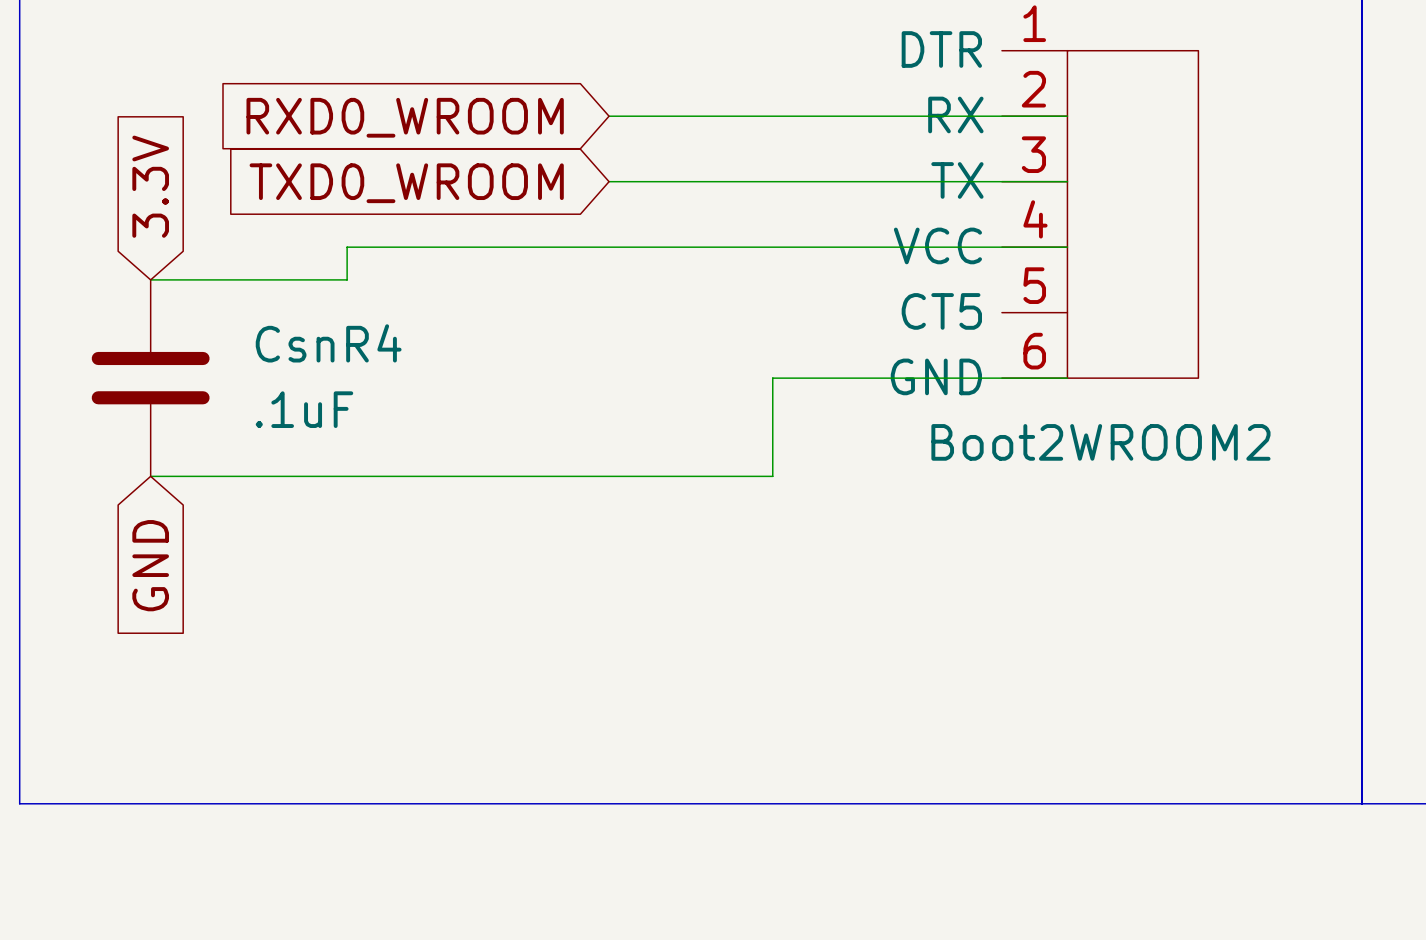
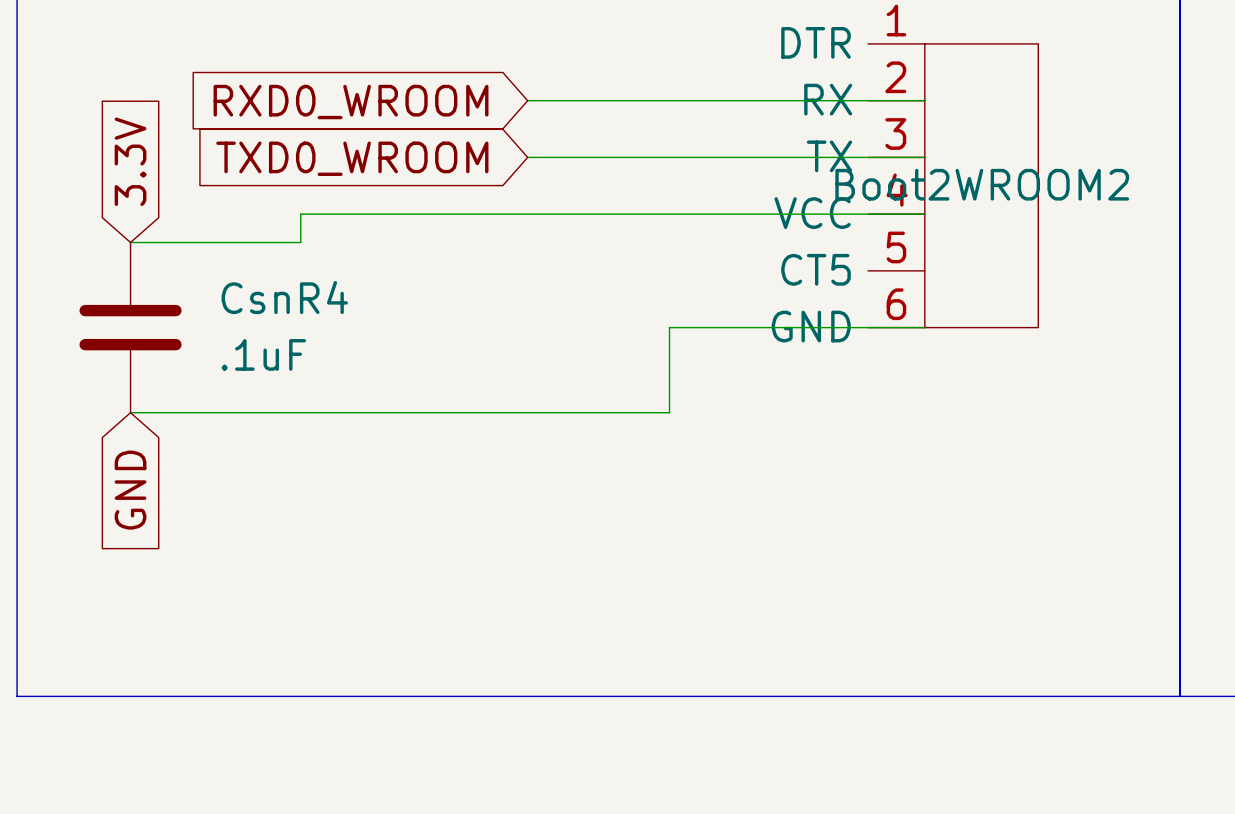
Boot2WROOM2 name position: Boot2WROOM2 (1100, 442) -> Boot2WROOM2 (982, 184)

